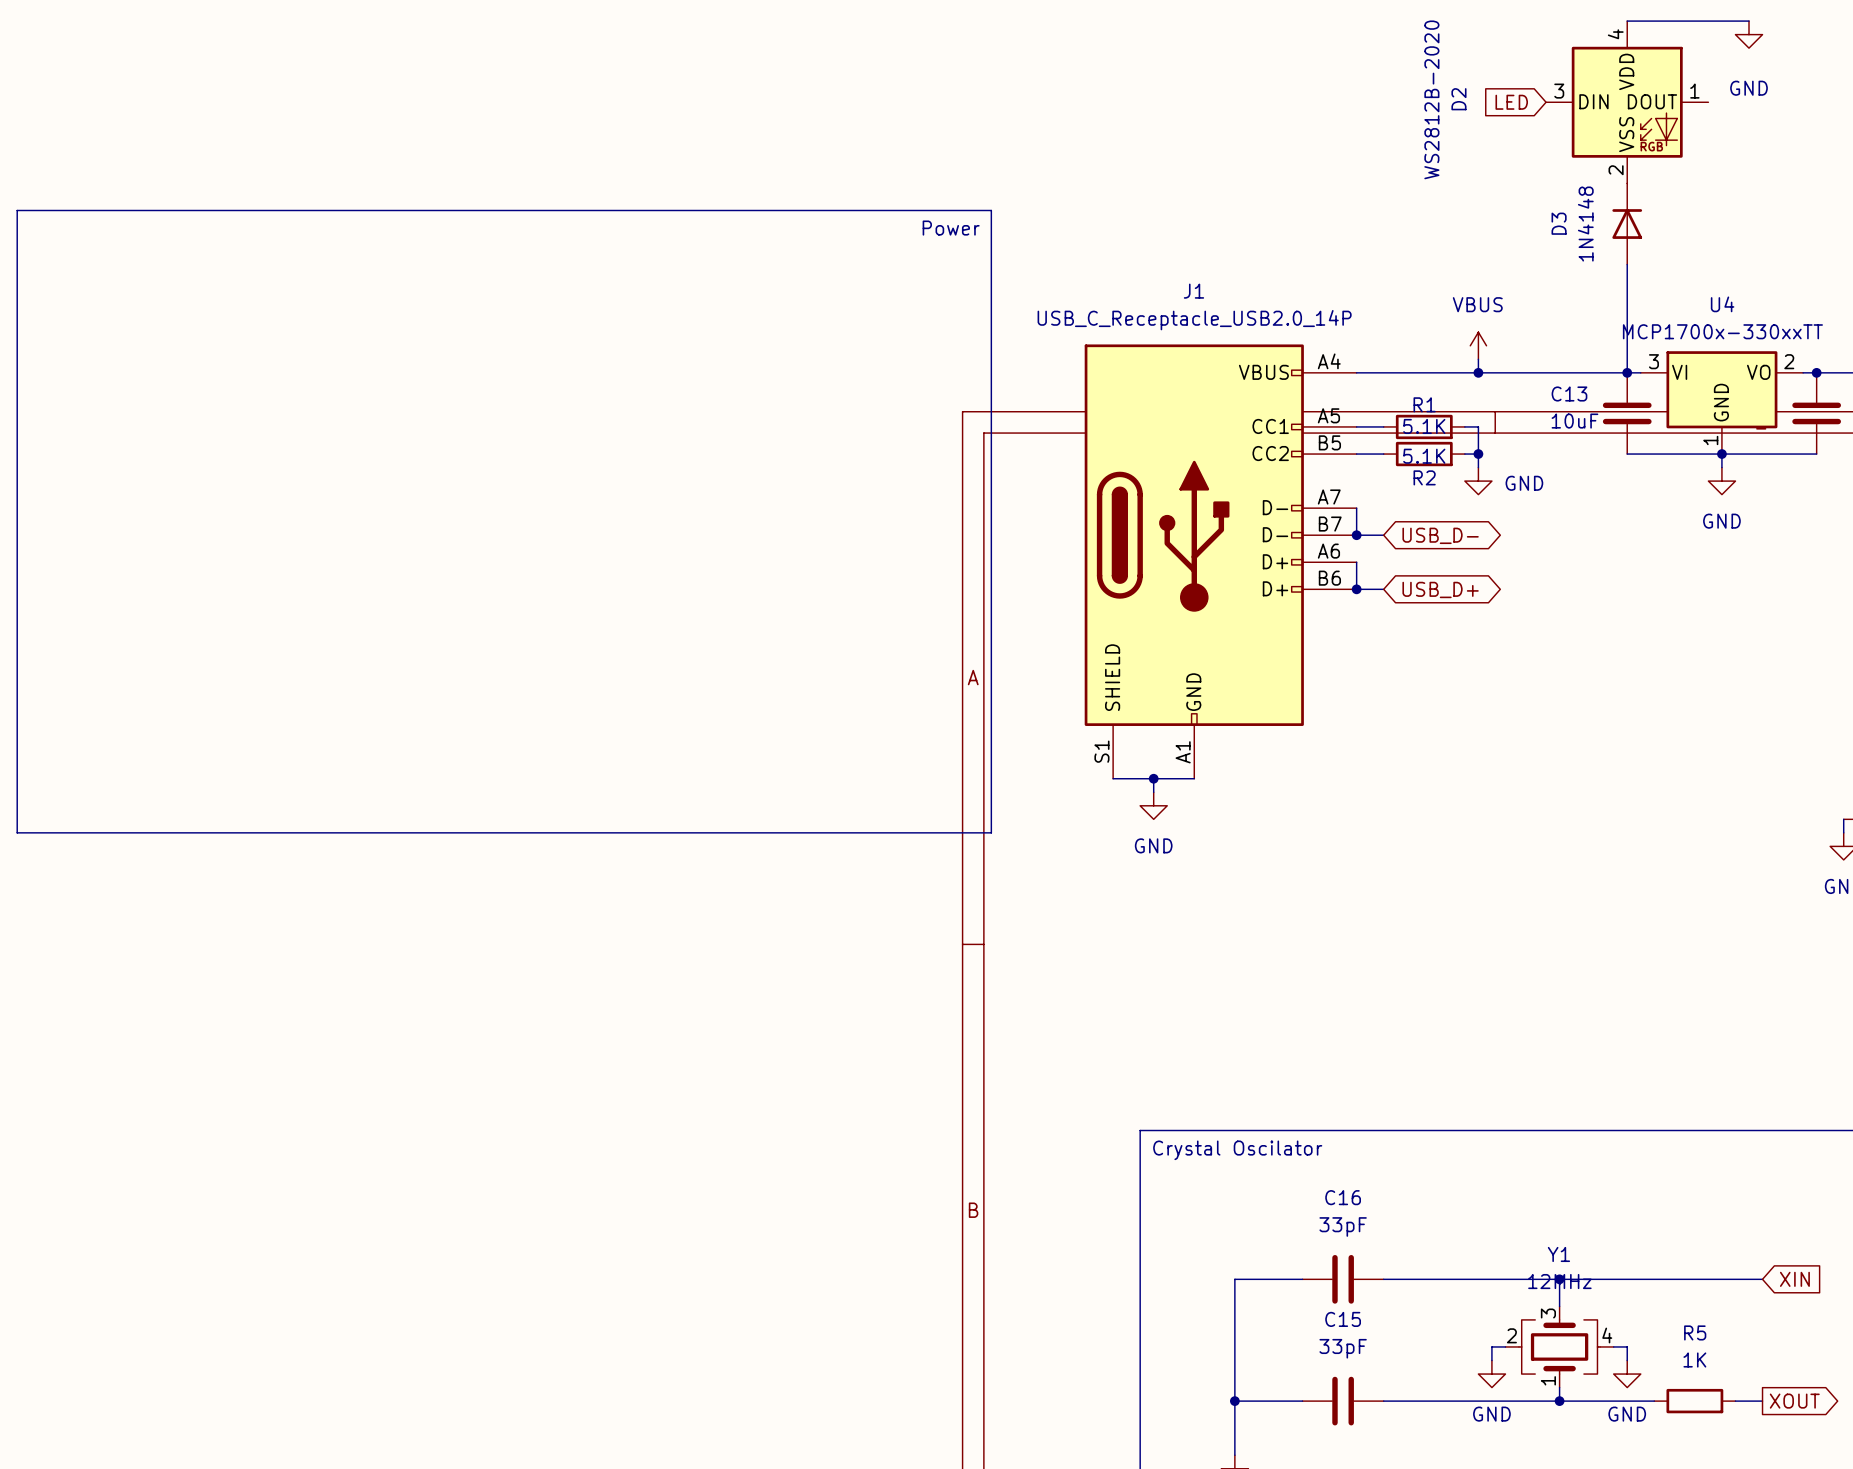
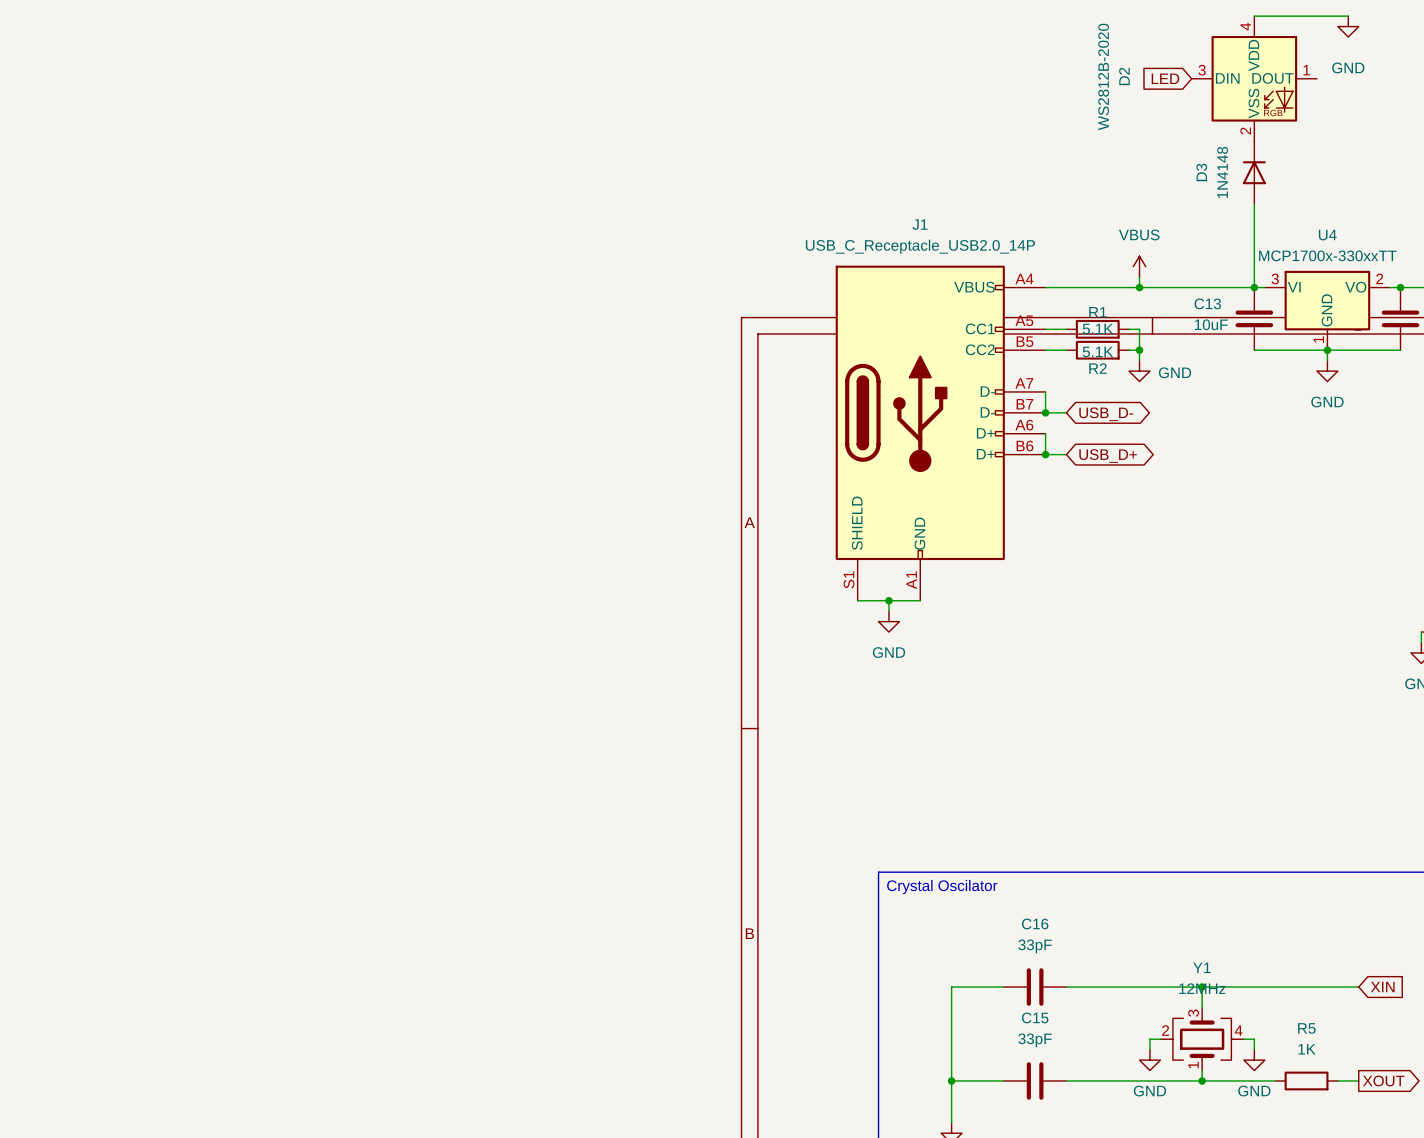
line: (17, 210) (991, 210) (991, 832) (17, 832) (17, 210) -> none
text: Power (951, 228) -> none

